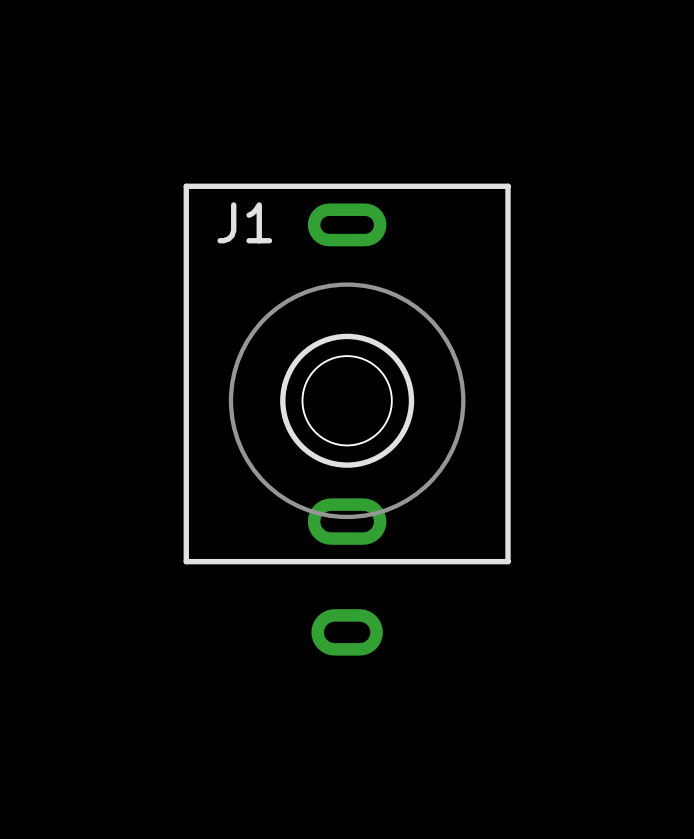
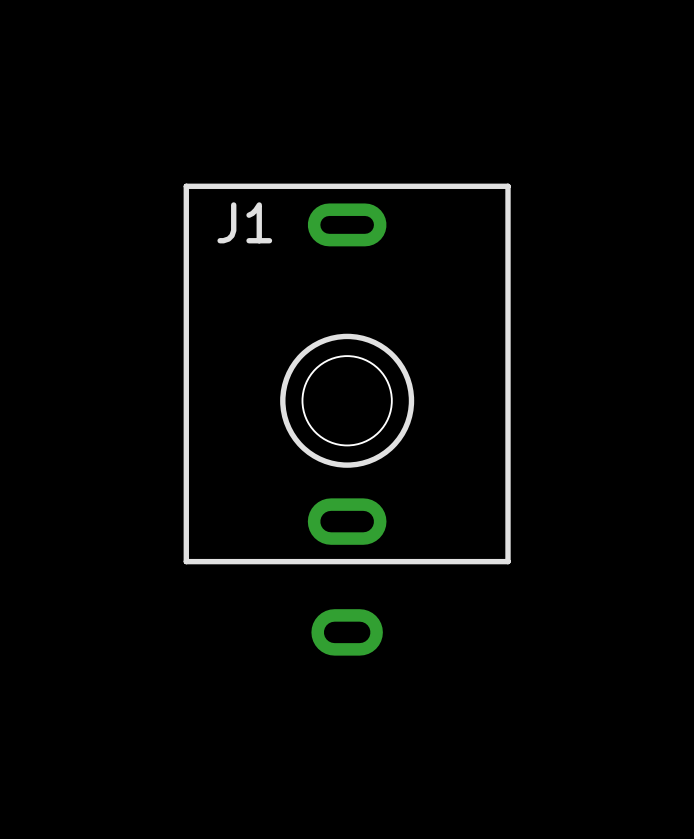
drawing: [228, 282, 466, 520] -> none

